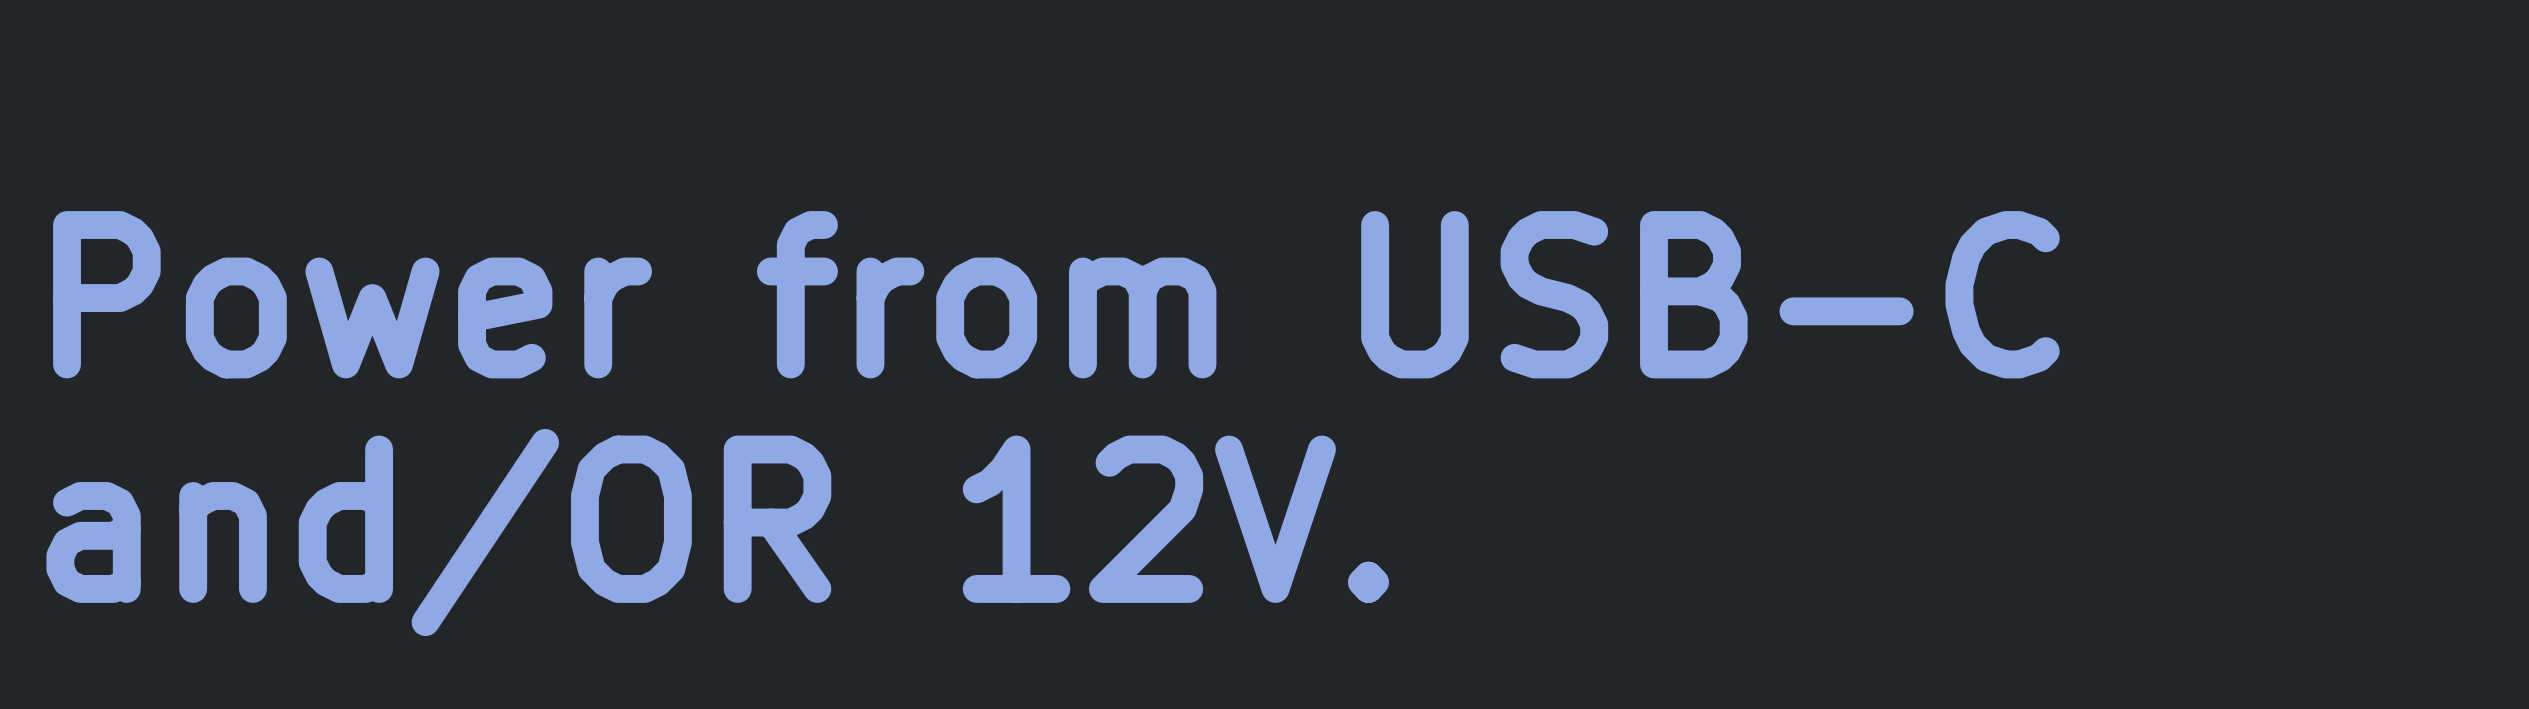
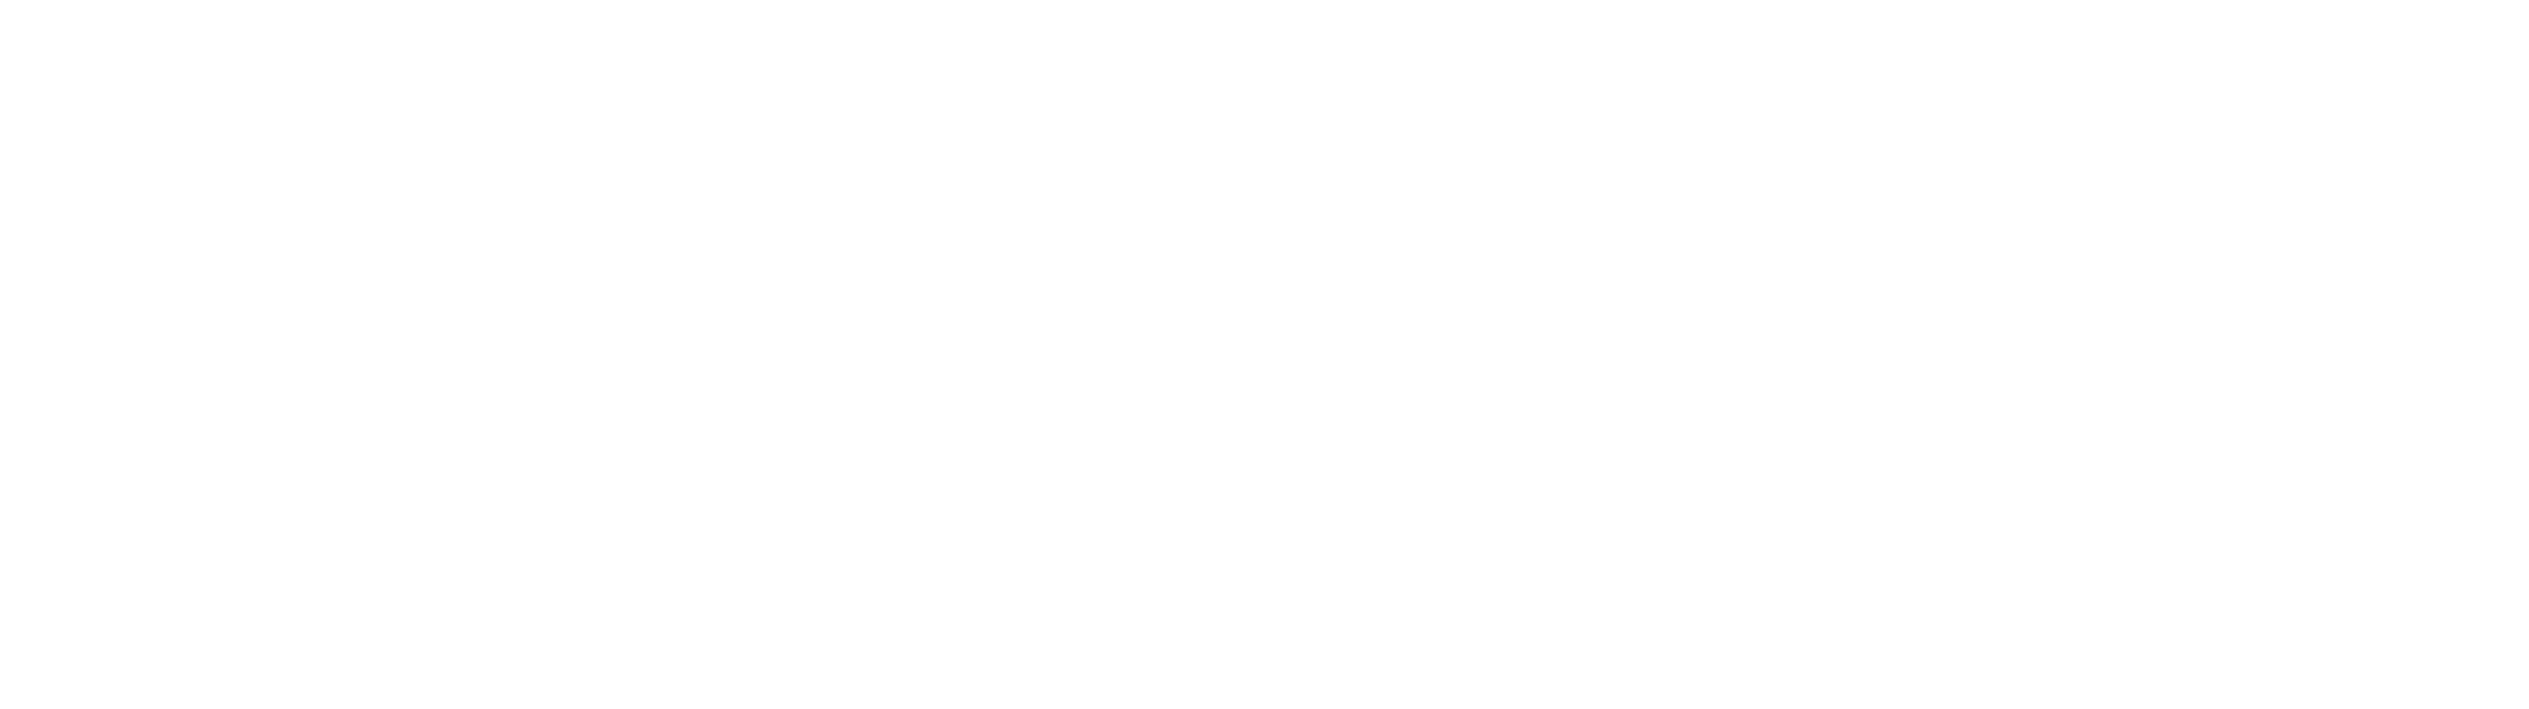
text: Power from USB-C (1056, 294) -> none
text: and/OR 12V. (717, 532) -> none

